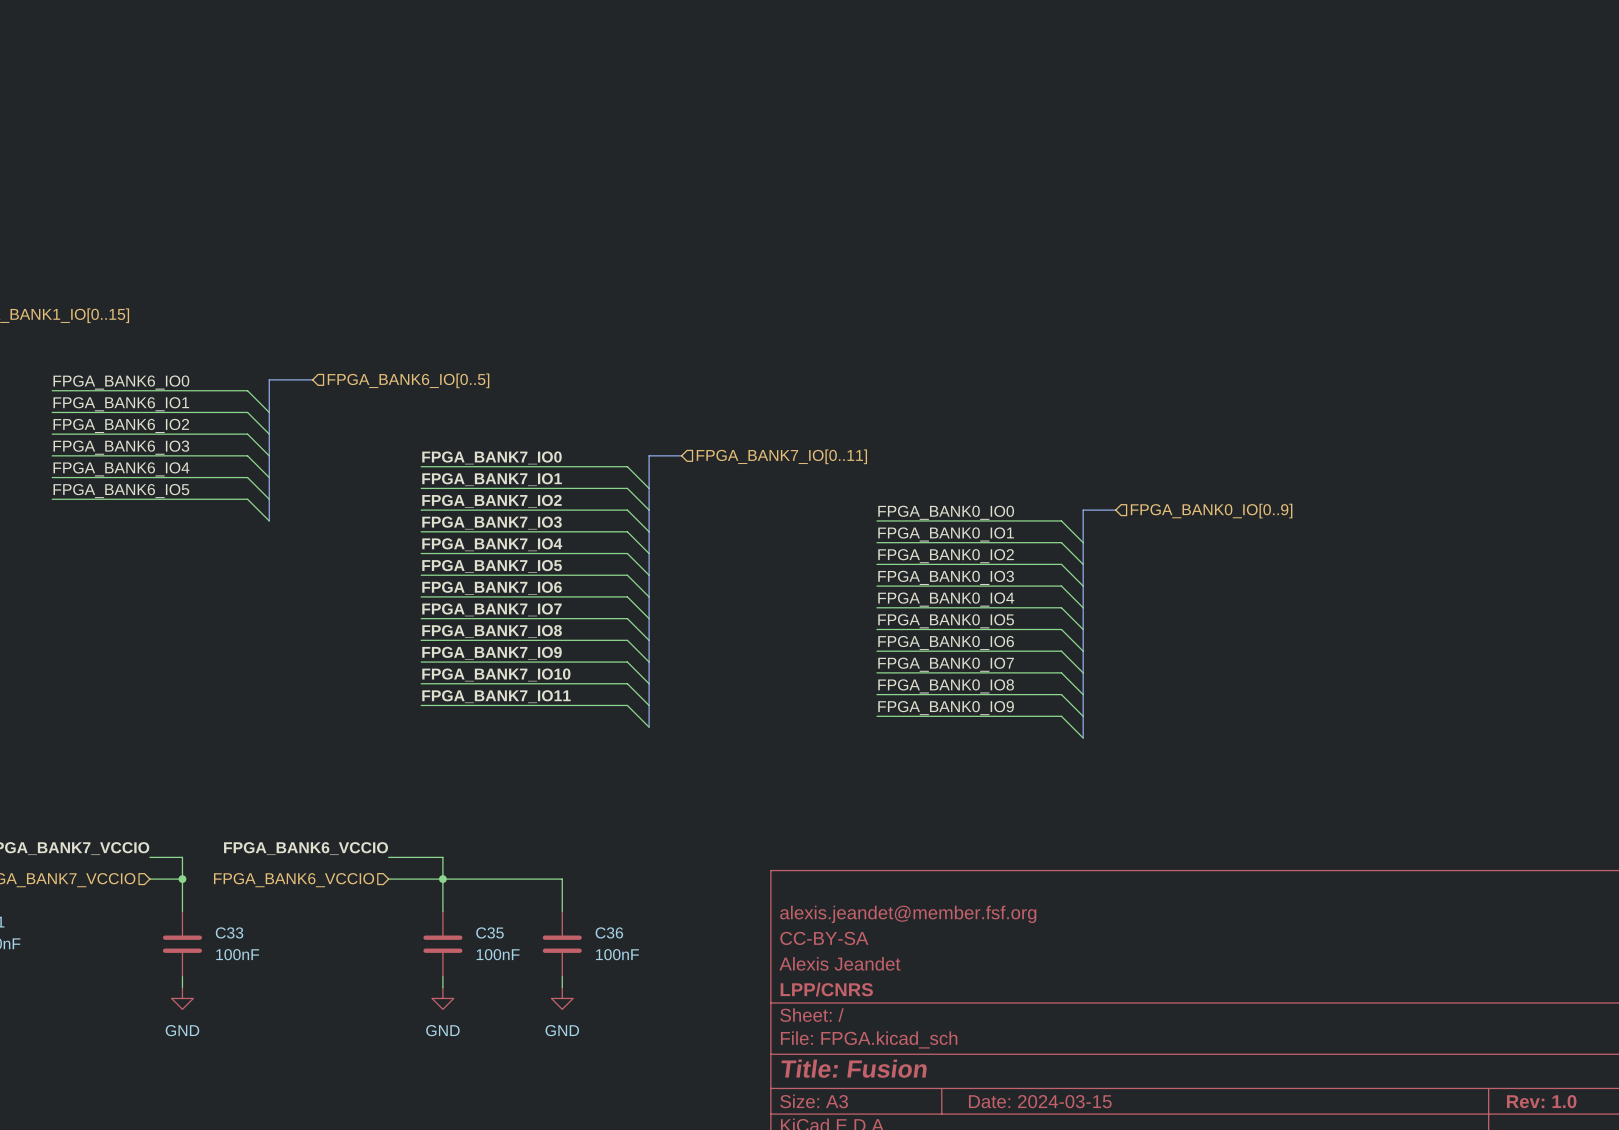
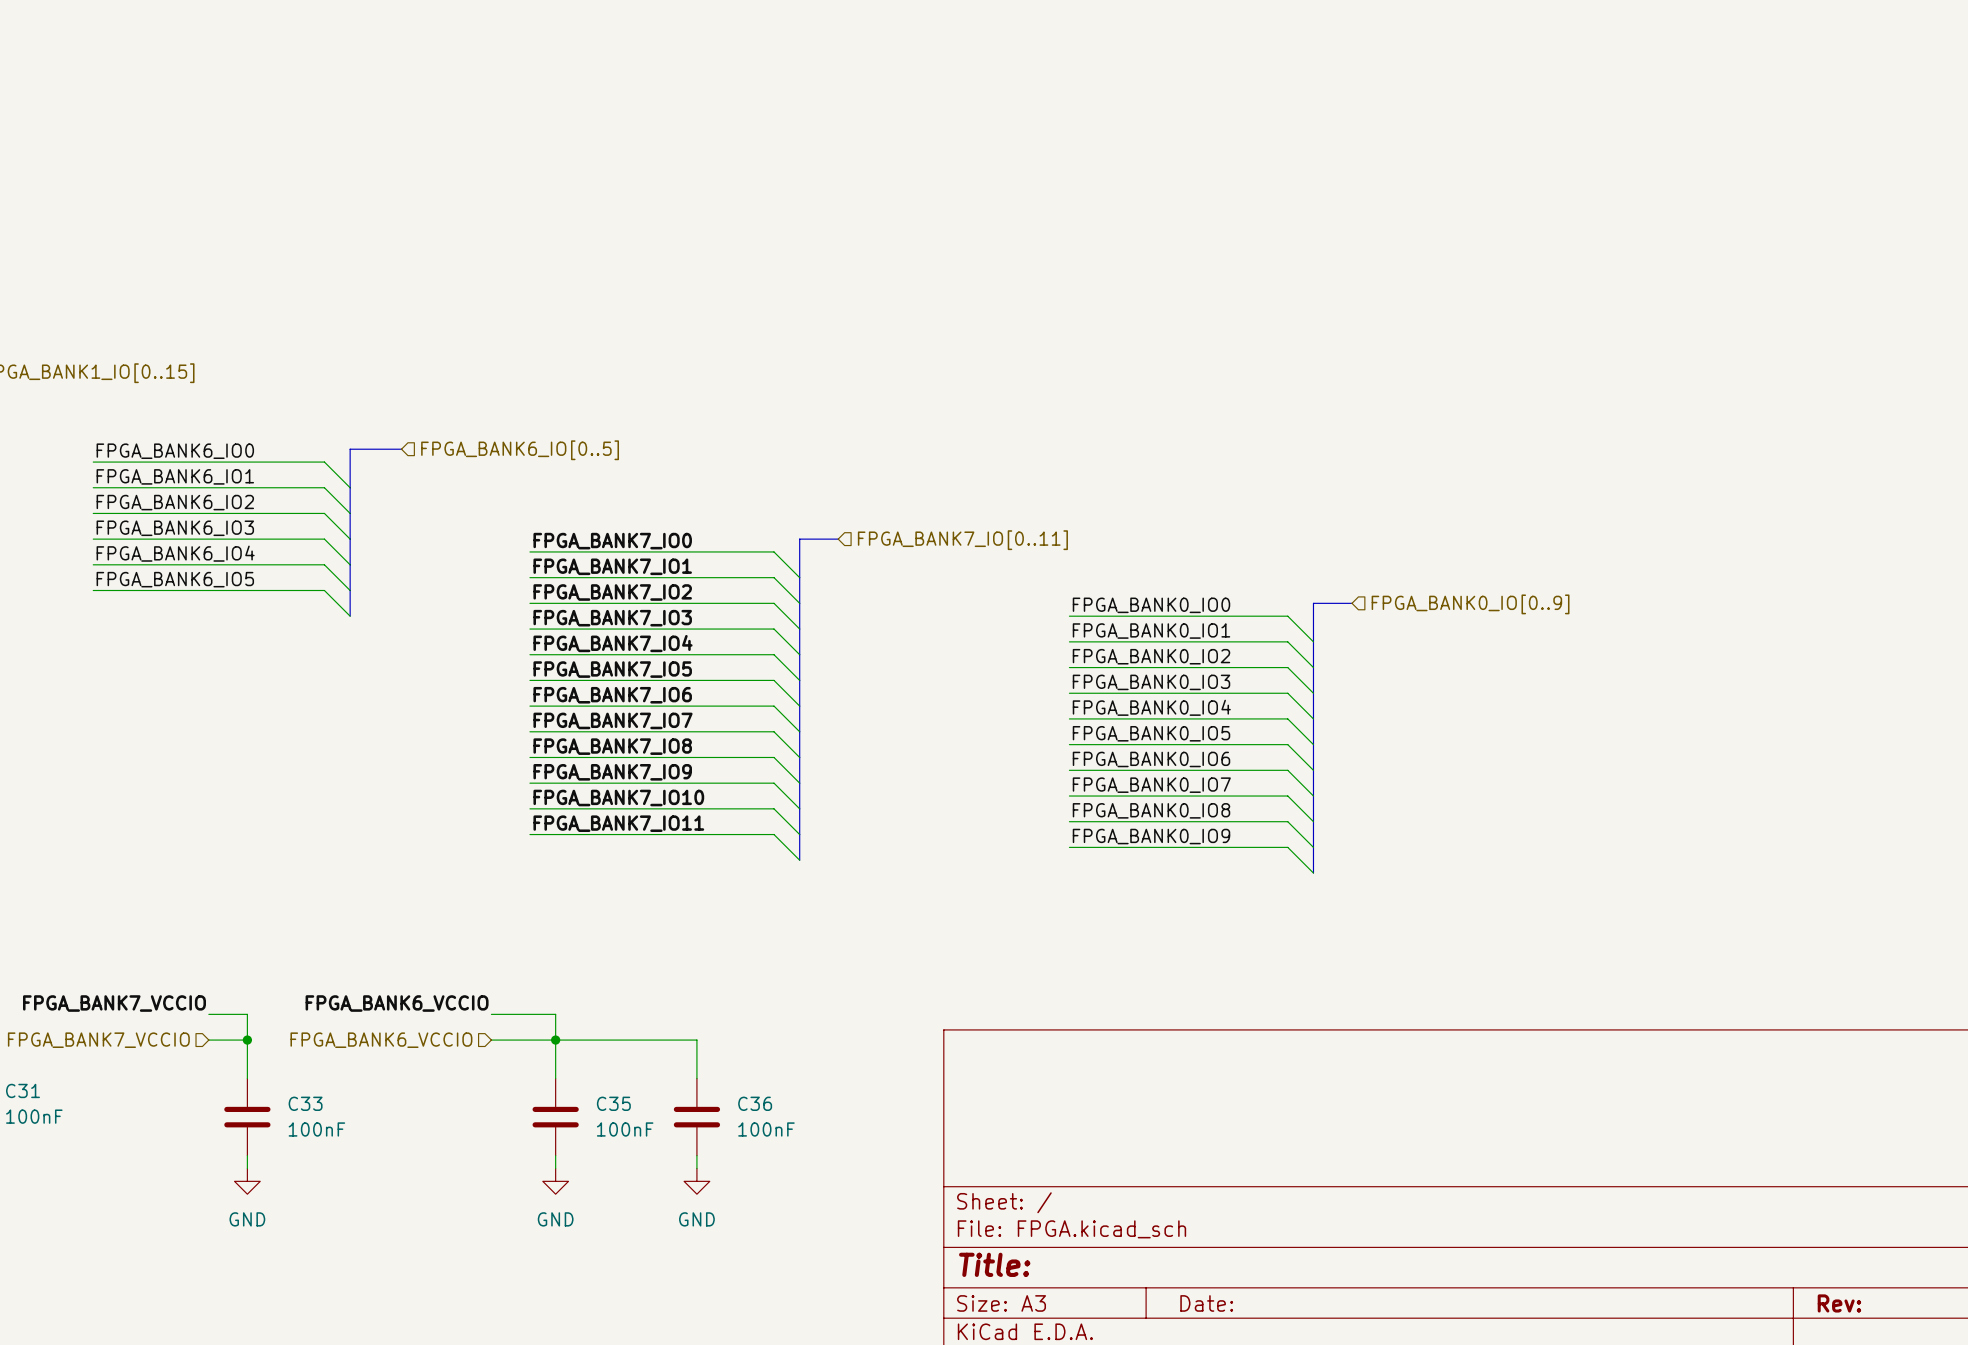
title block: alexis.jeandet@member.fsf.org (908, 914) -> none
title block: CC-BY-SA (824, 938) -> none
title block: Alexis Jeandet (839, 963) -> none
title block: LPP/CNRS (826, 989) -> none
title block: Title: Fusion (854, 1068) -> Title: (994, 1264)
title block: Date: 2024-03-15 (1040, 1101) -> Date: (1206, 1303)
title block: Rev: 1.0 (1541, 1101) -> Rev: (1839, 1303)

